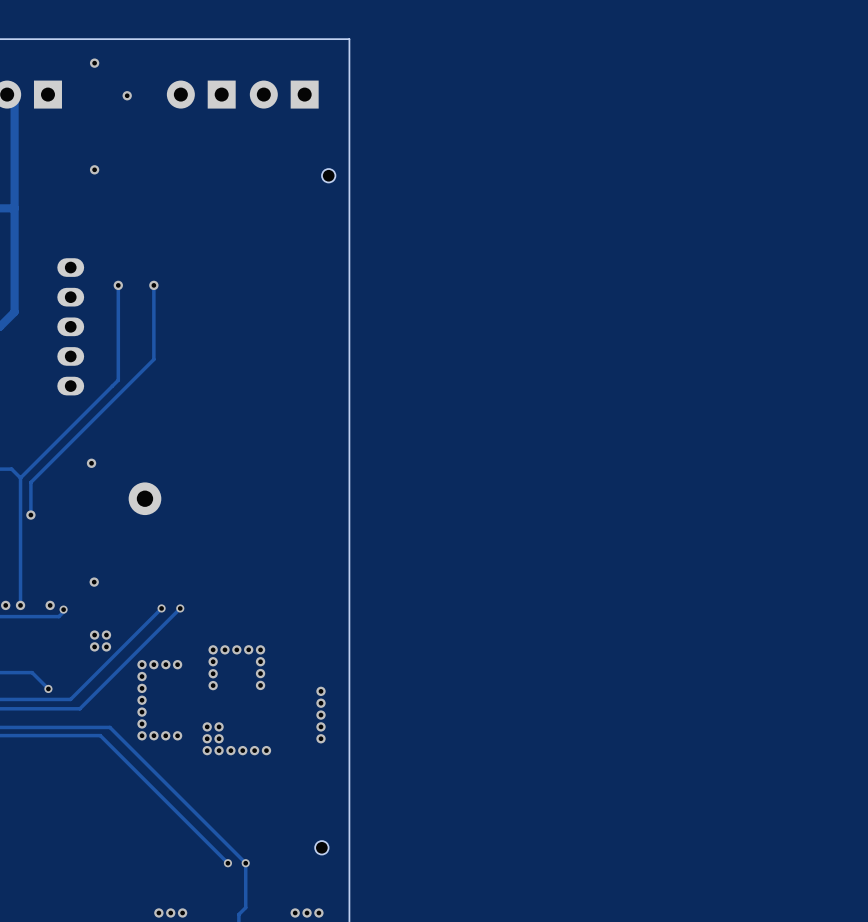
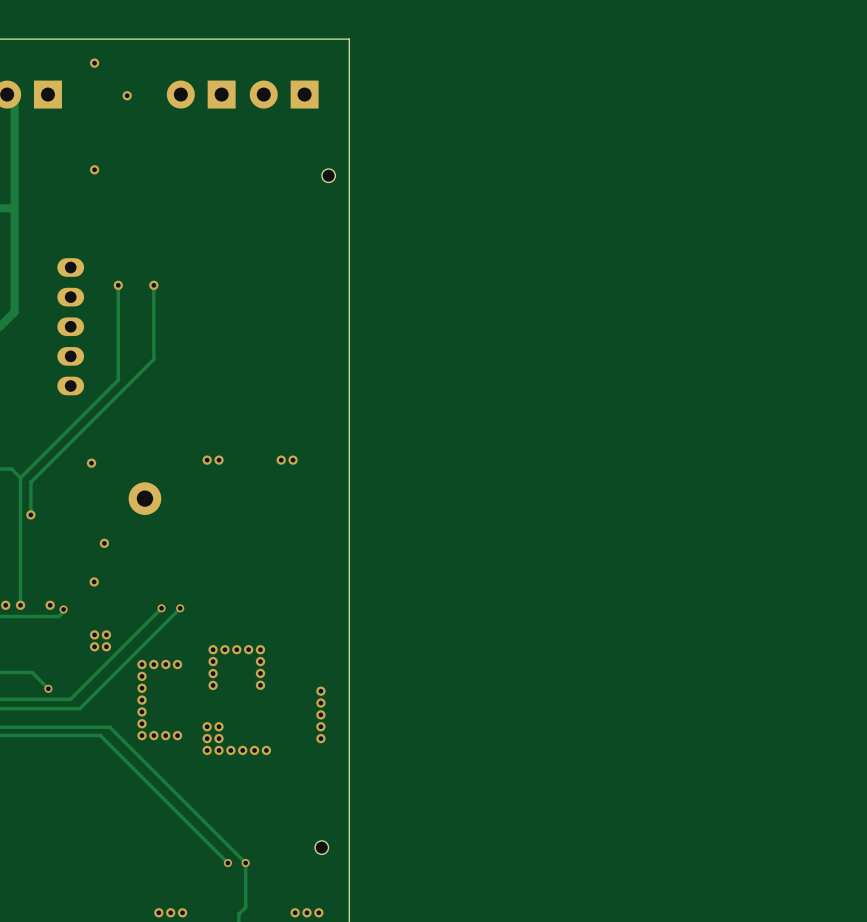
via: none -> (207, 460)
via: none -> (219, 460)
via: none -> (281, 460)
via: none -> (293, 460)
via: none -> (104, 543)

